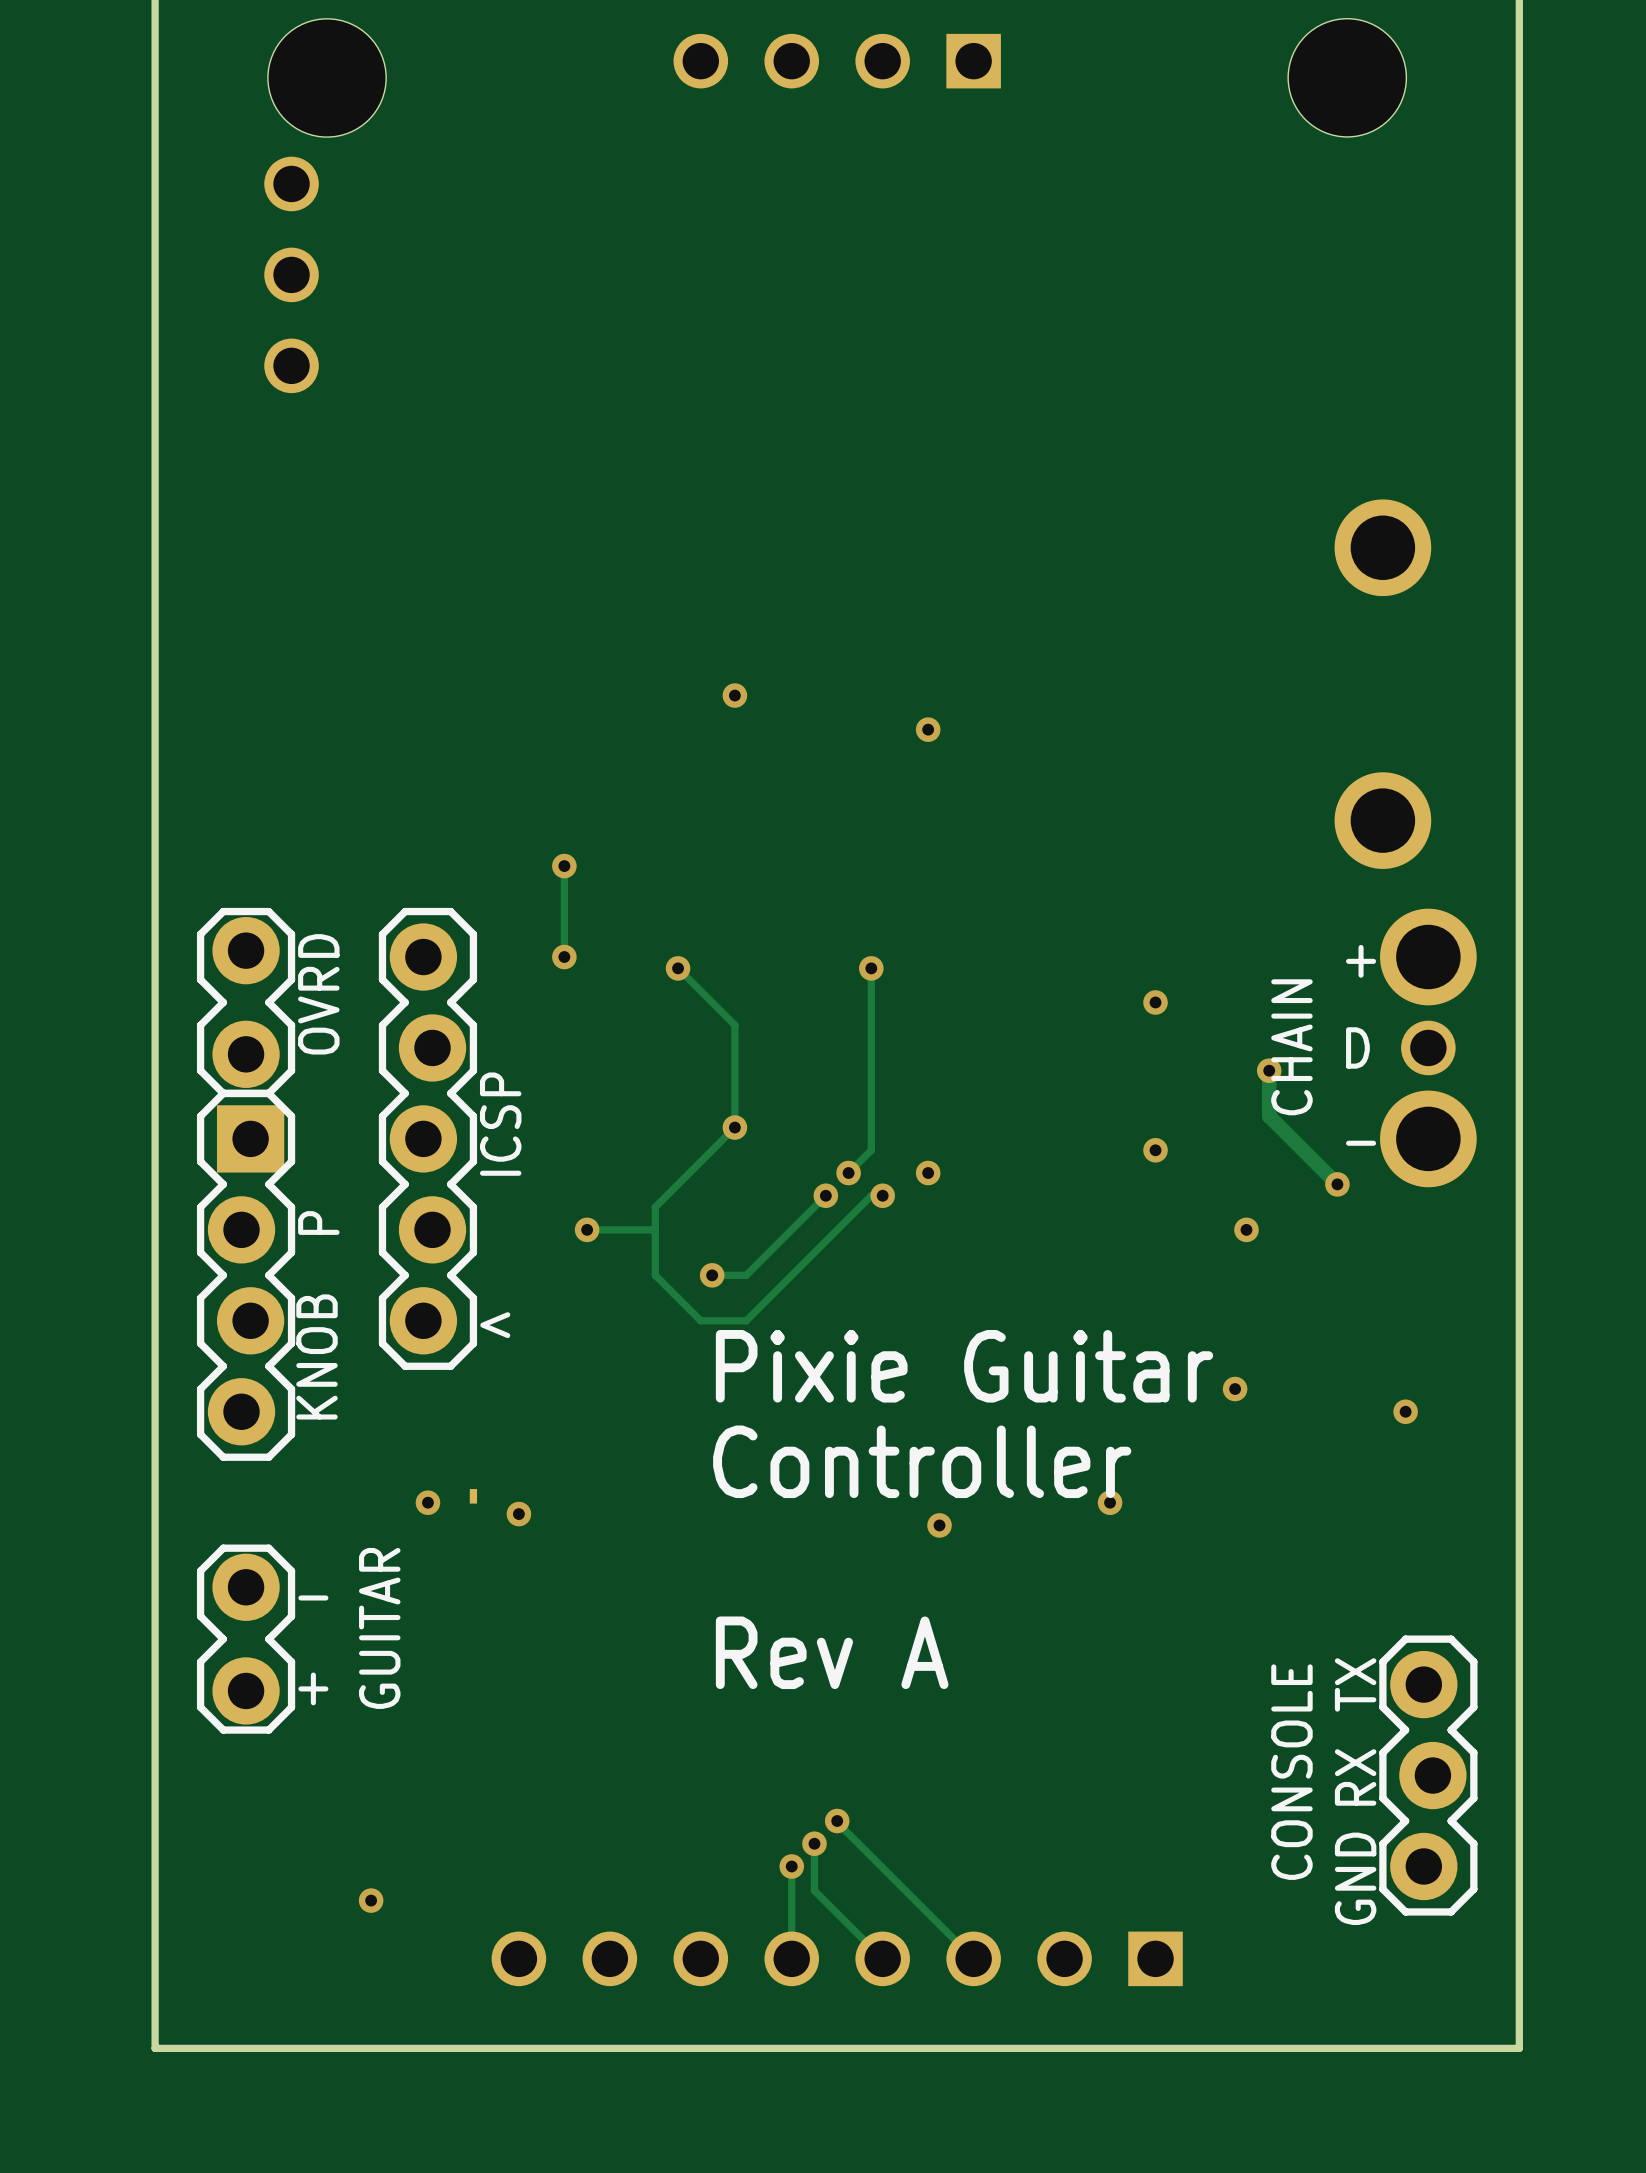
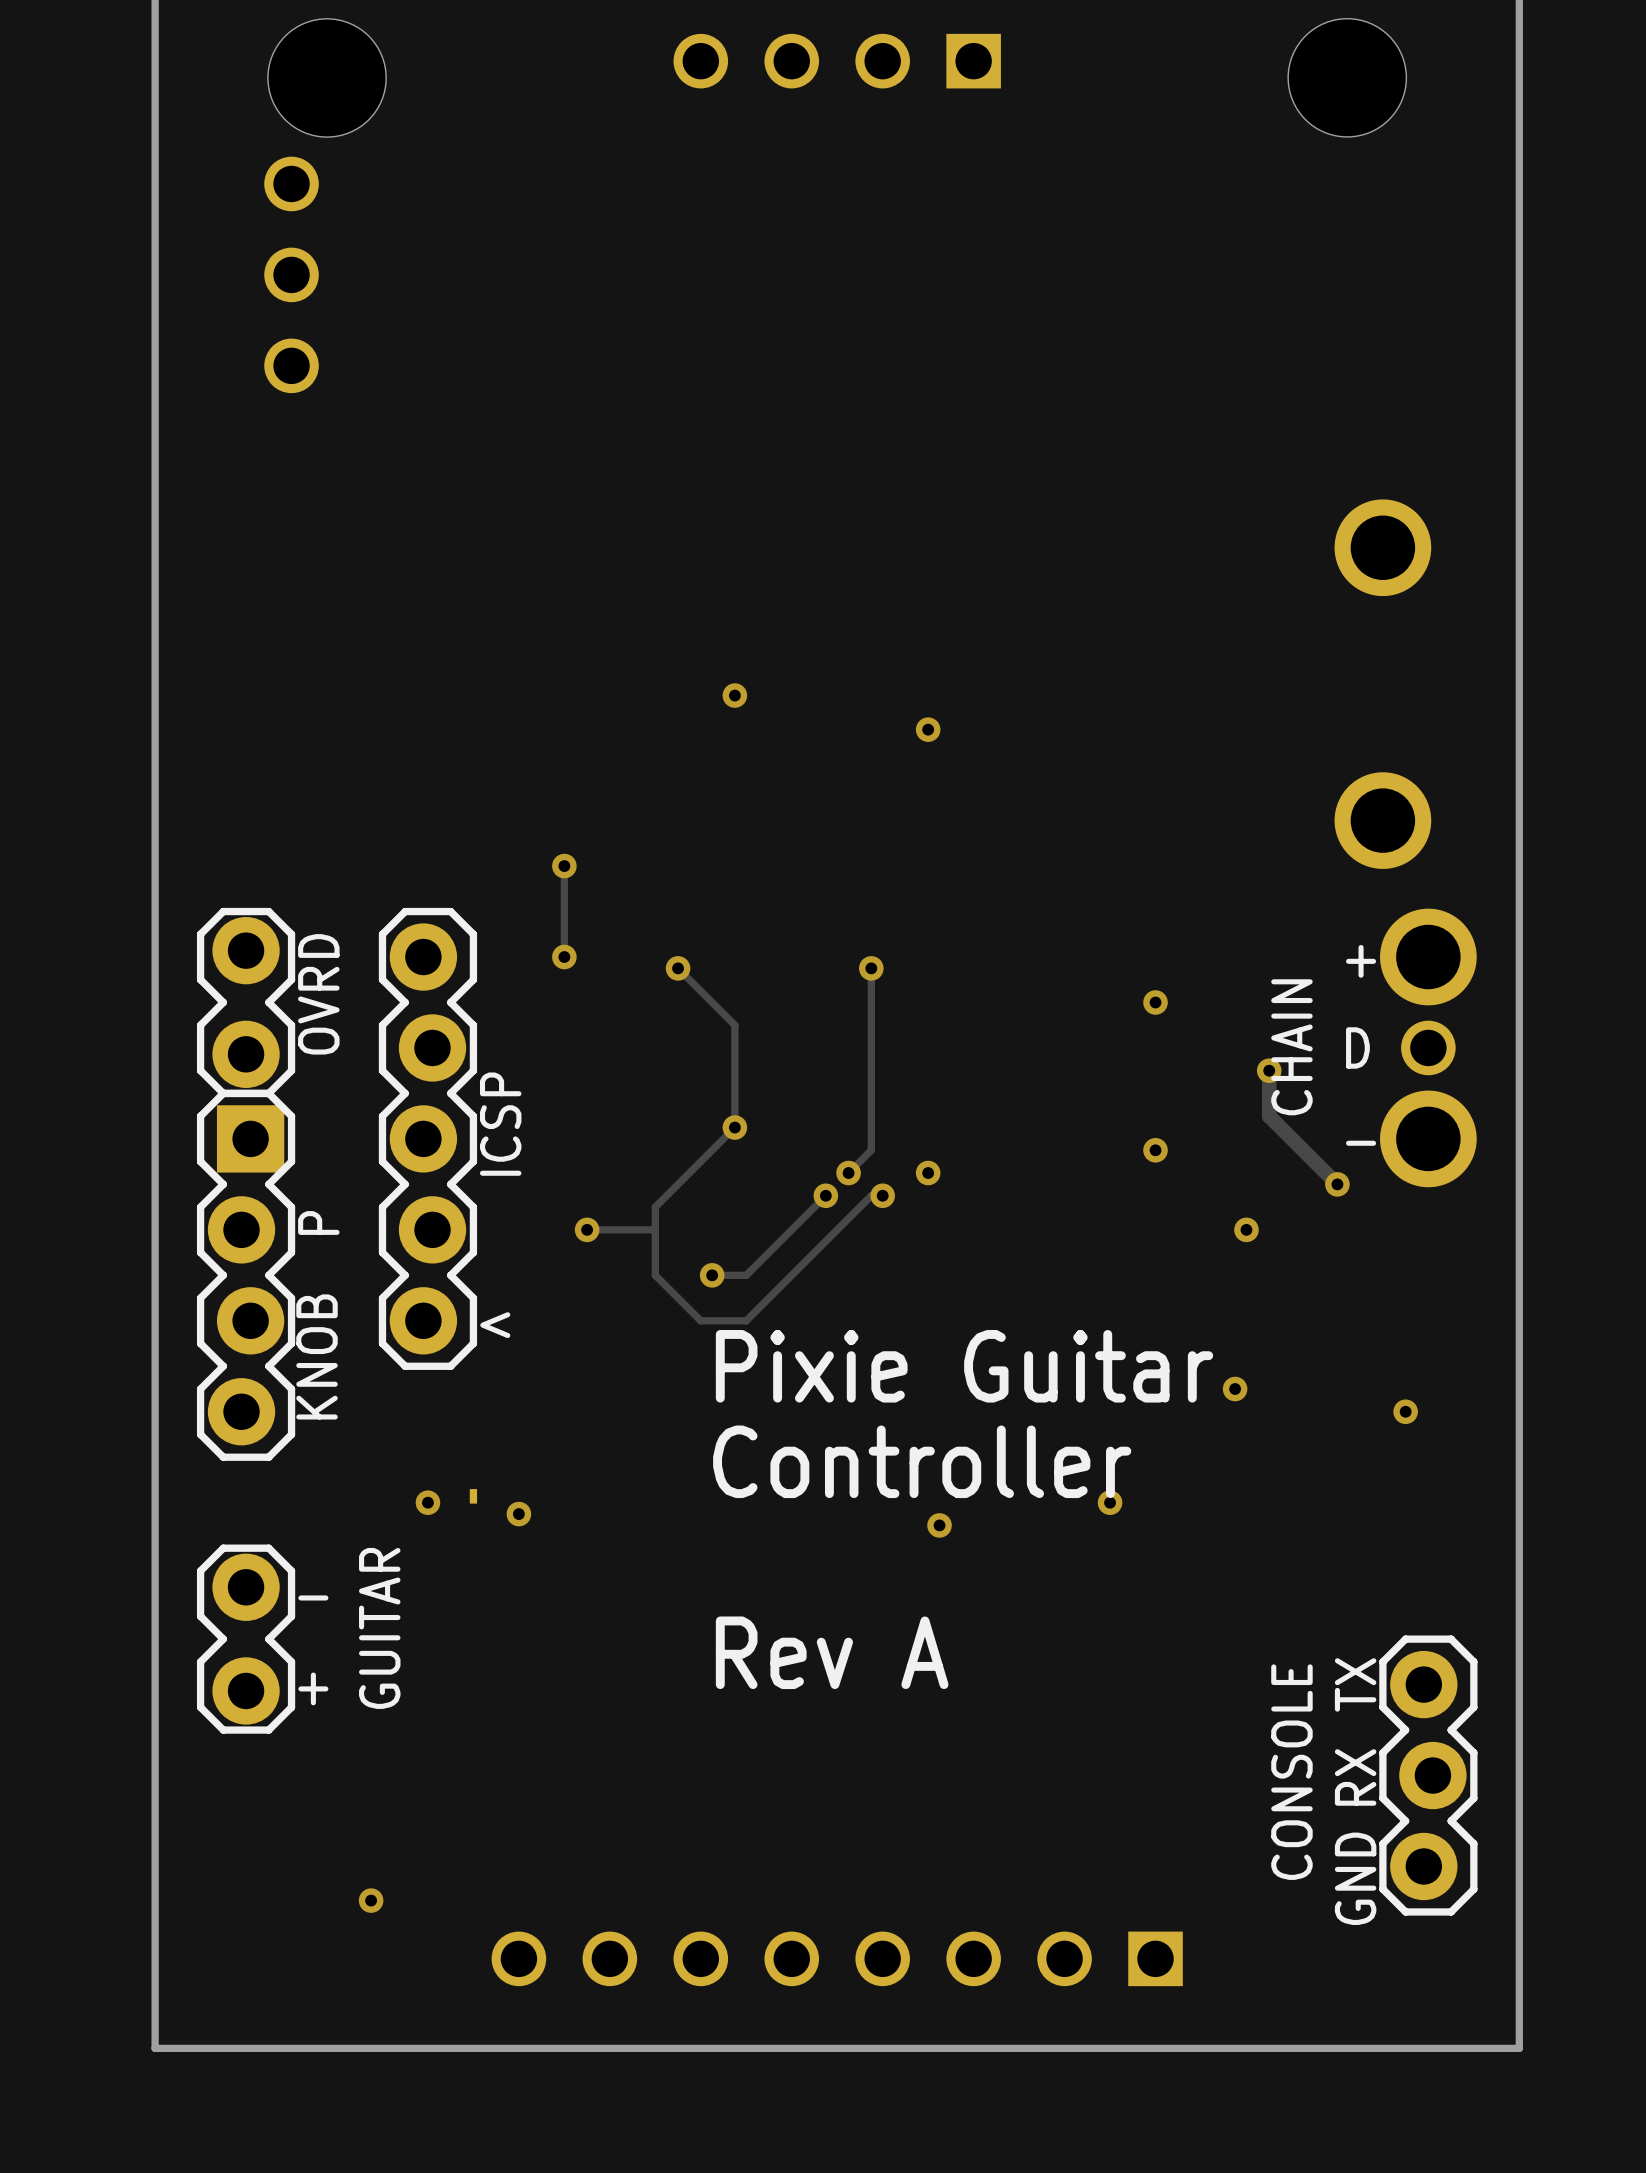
track: (837, 1821) (973, 1958) -> none
via: (837, 1821) -> none
track: (814, 1843) (814, 1890) (882, 1958) -> none
via: (814, 1843) -> none
track: (791, 1866) (791, 1958) -> none
via: (791, 1866) -> none

